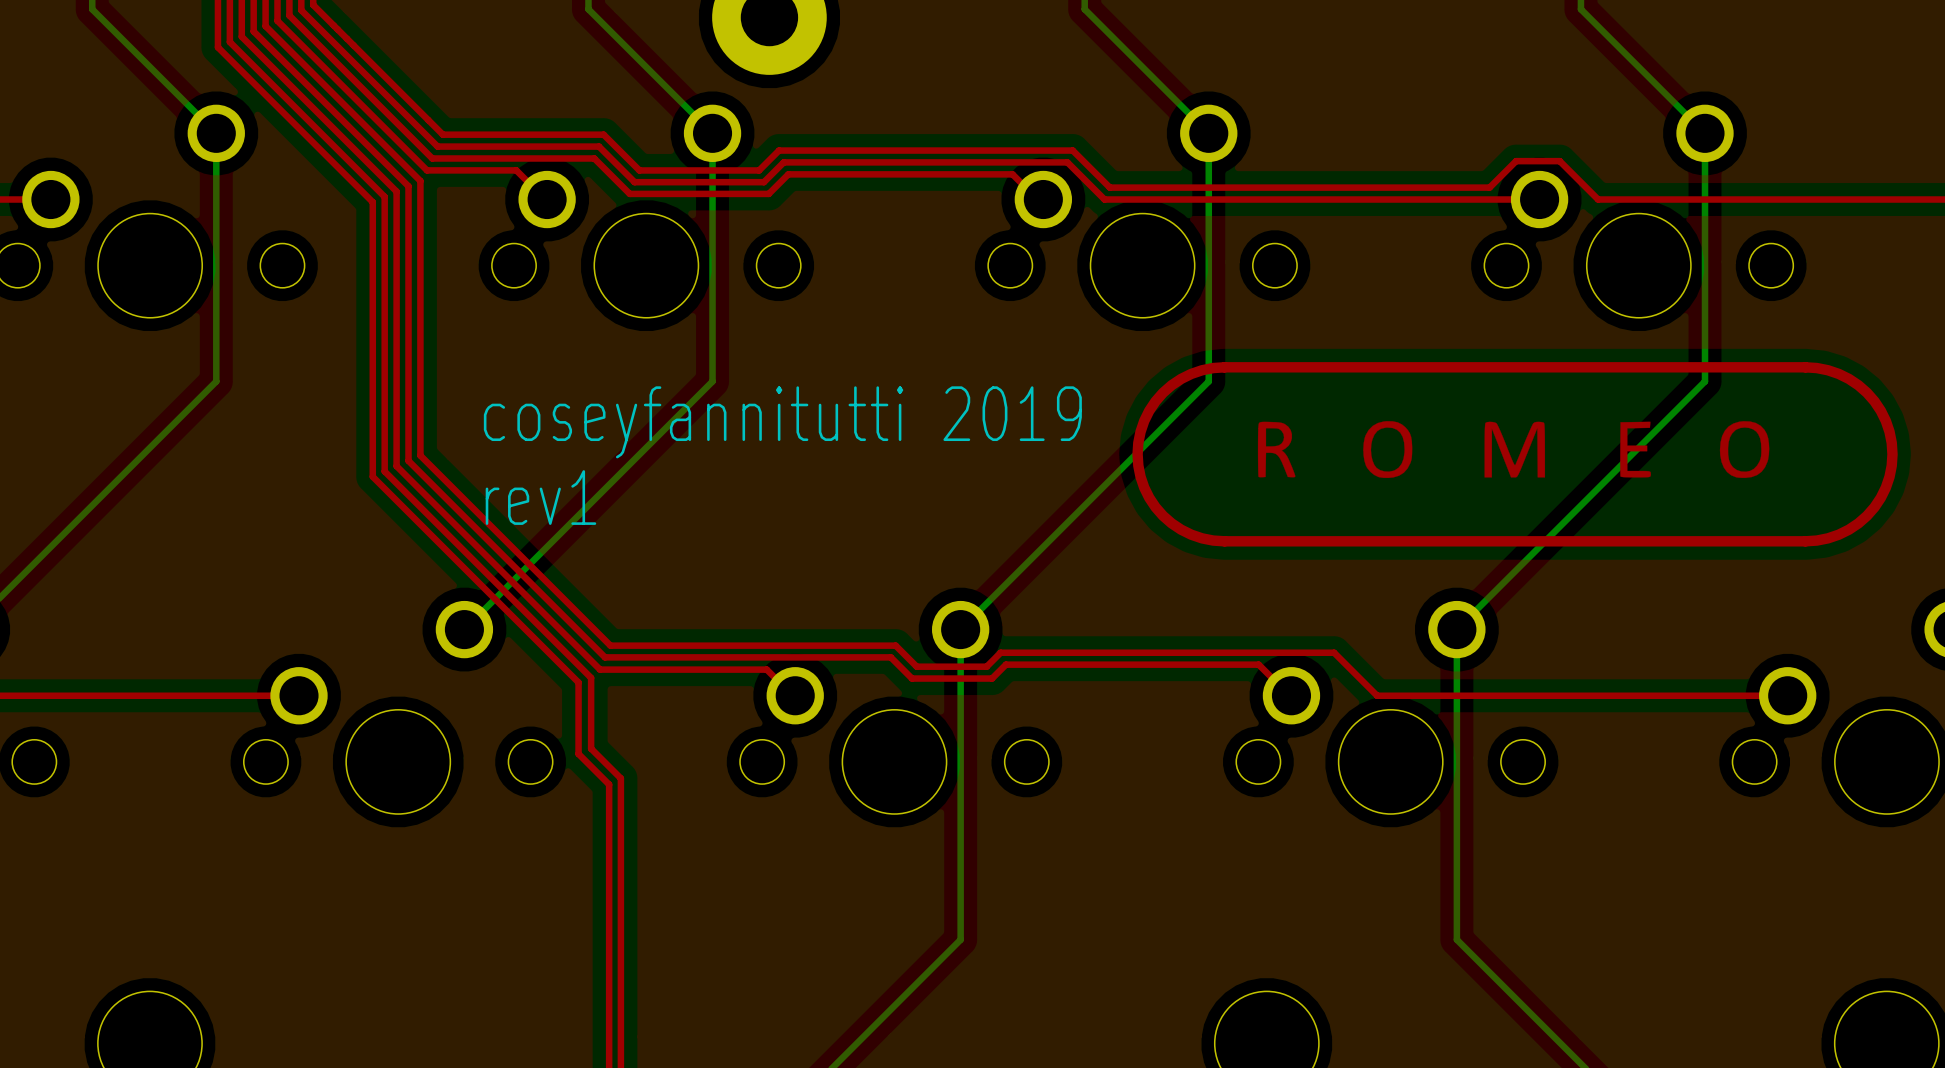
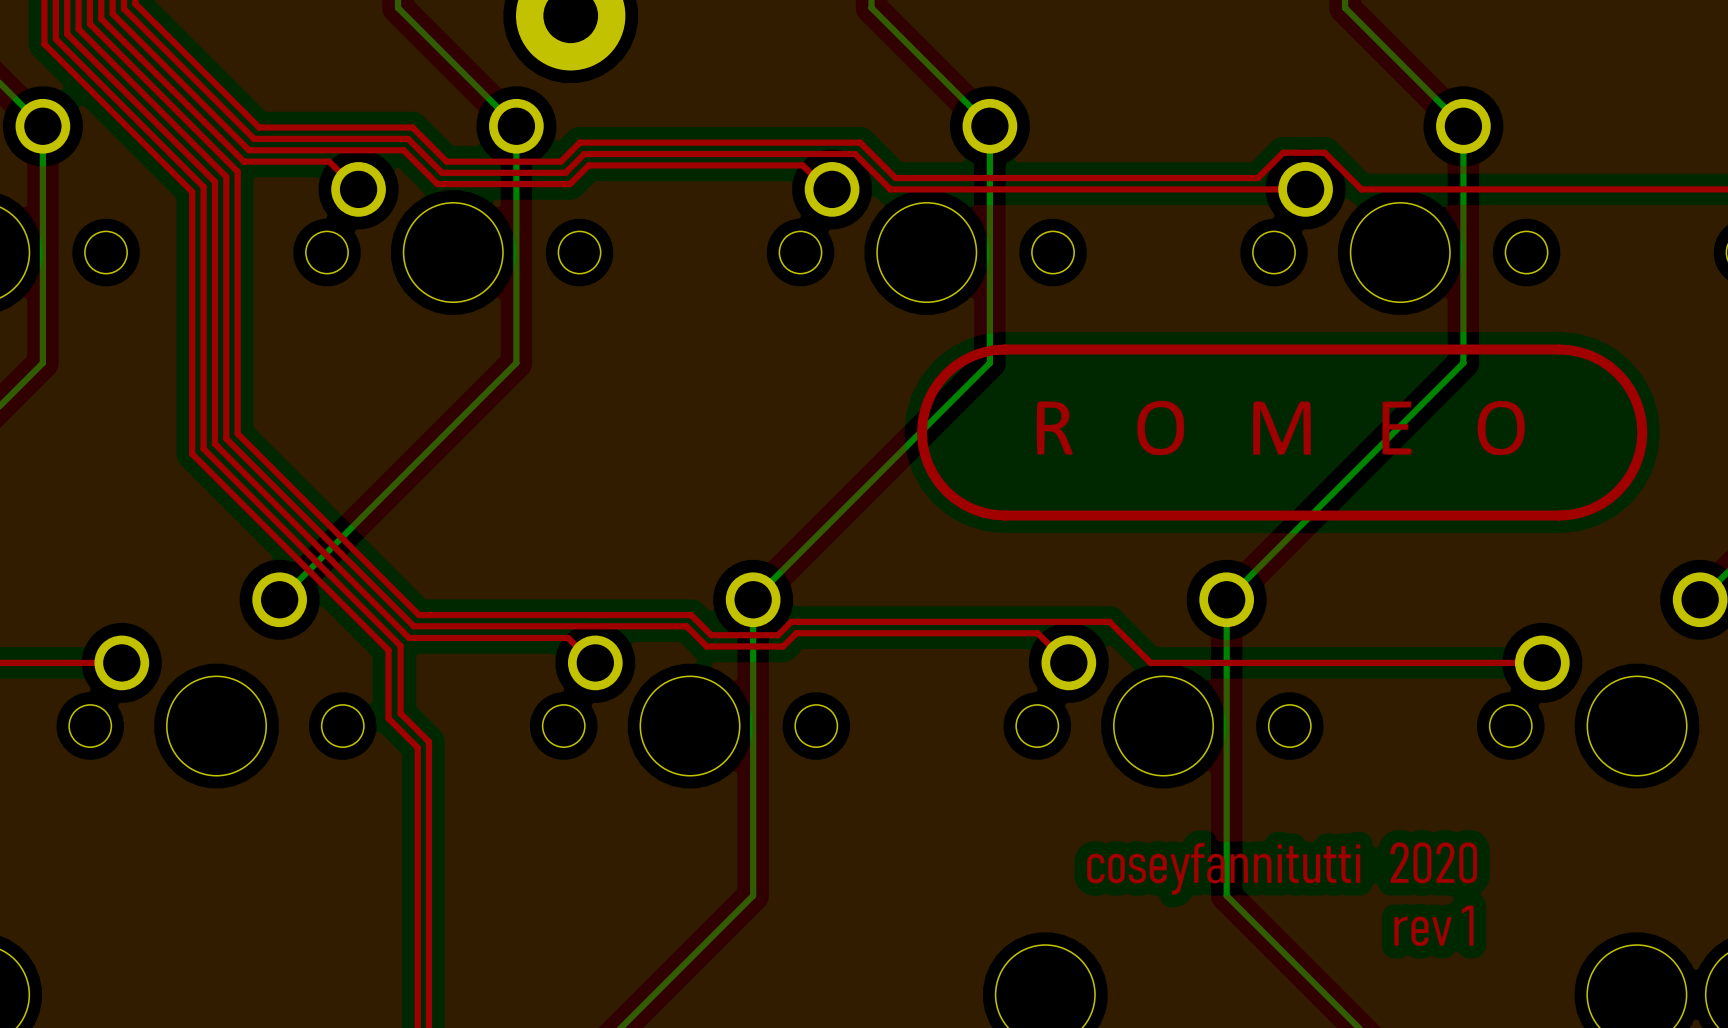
text: coseyfannitutti 2019 (782, 422) -> none
text: rev1 (540, 497) -> none
drawing: none -> [1087, 842, 1478, 947]

